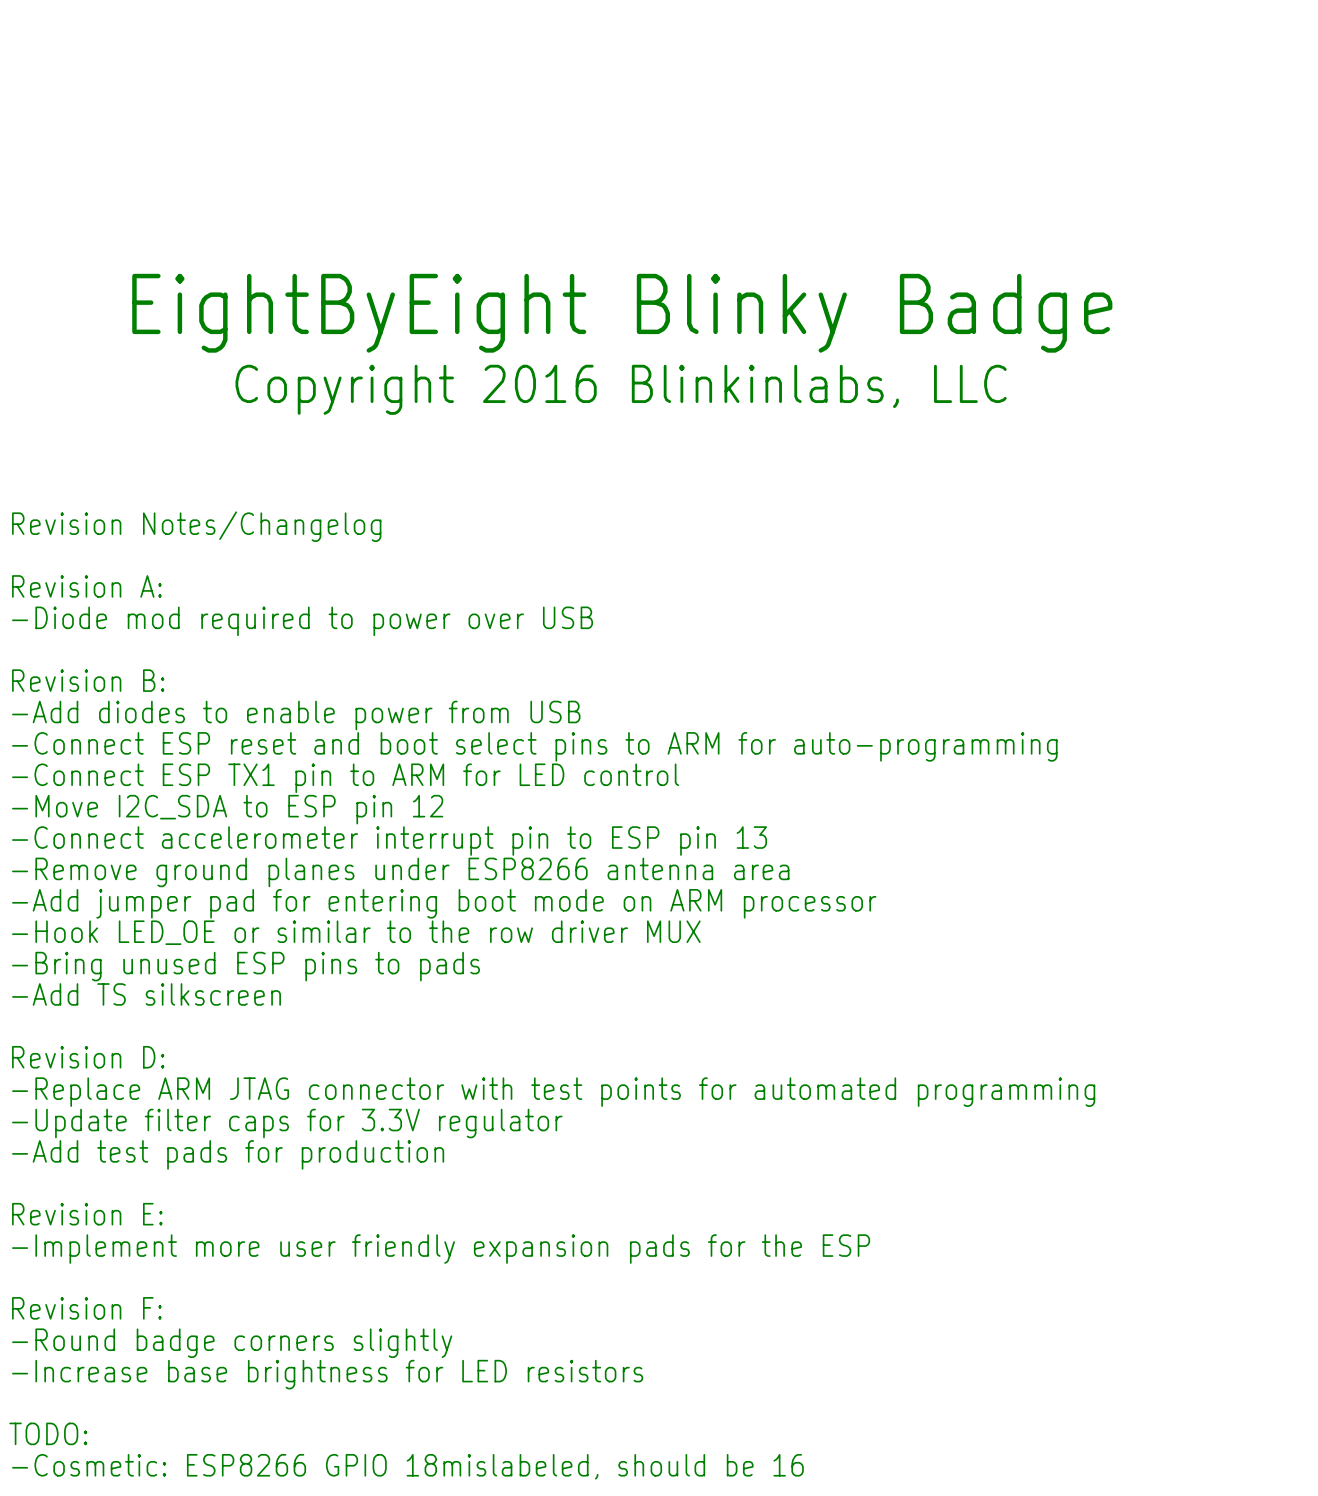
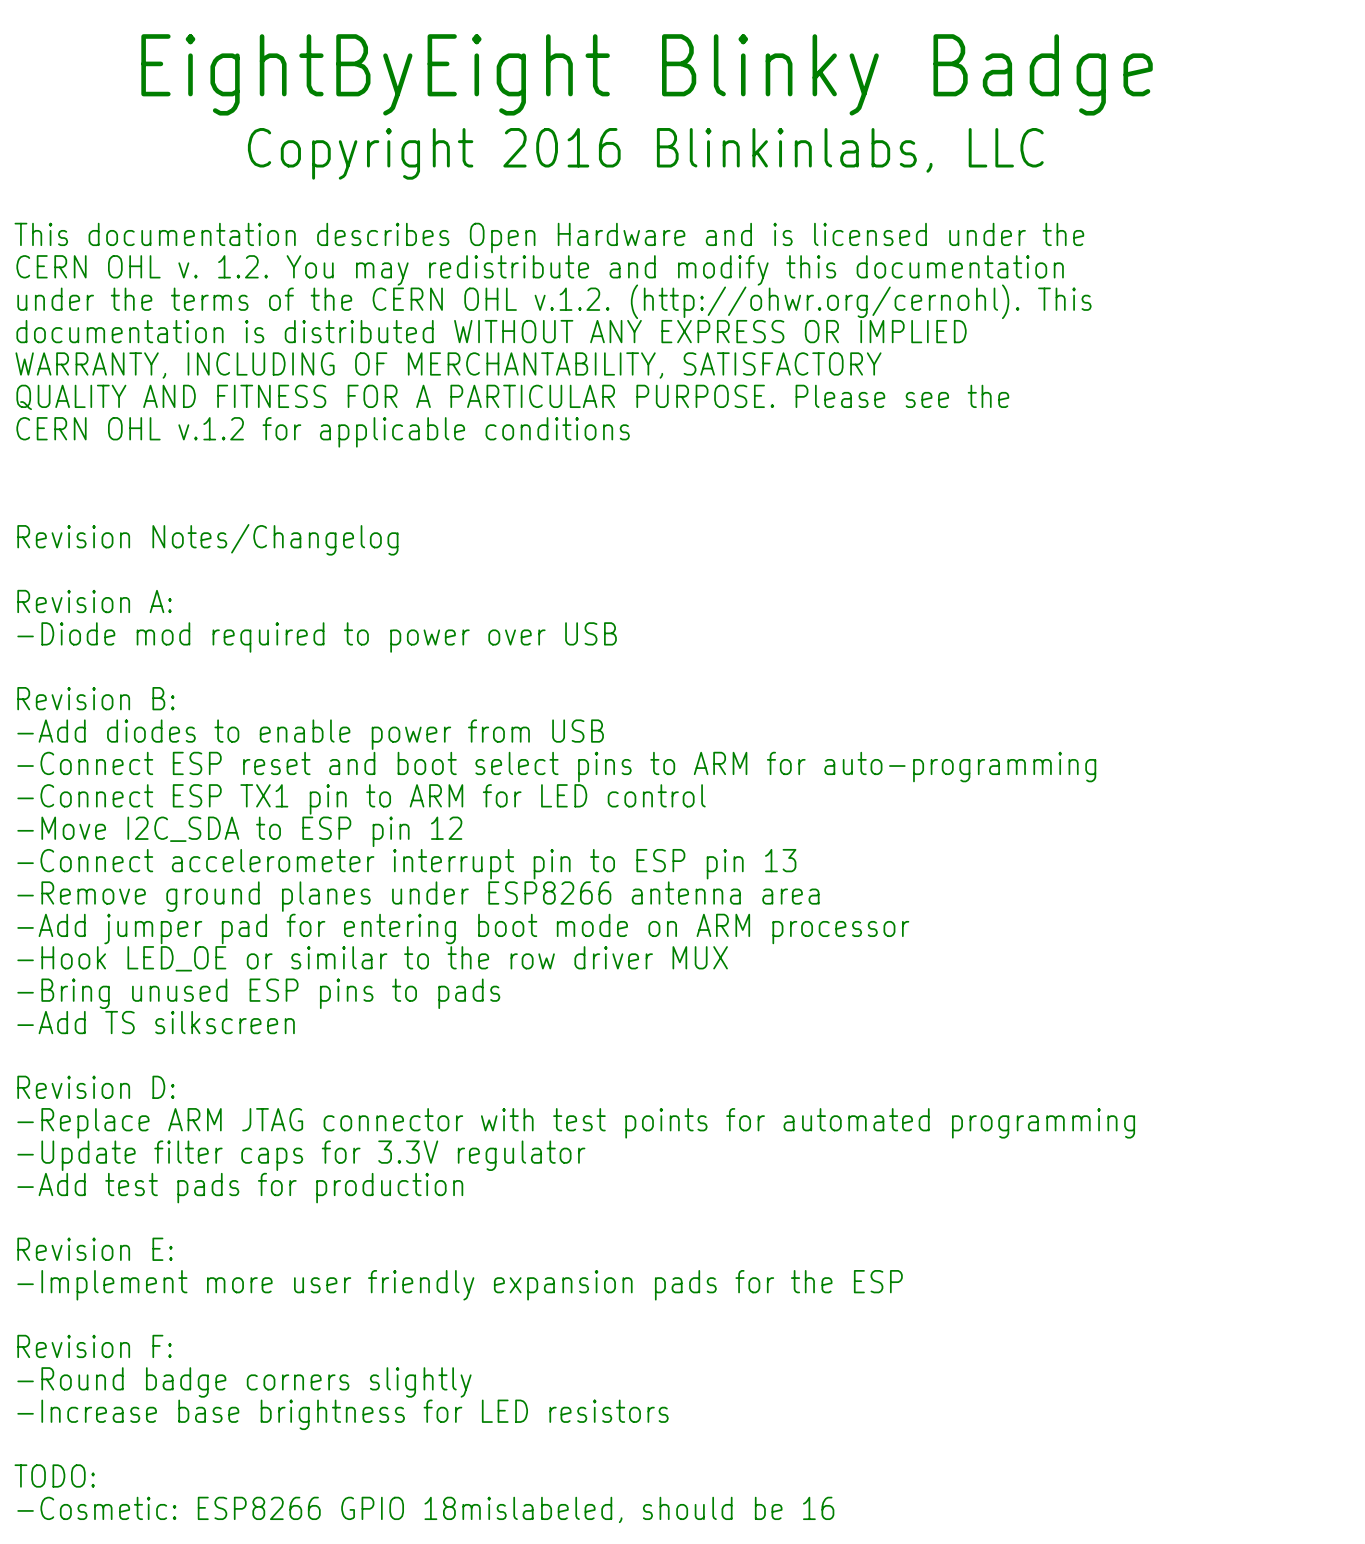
text: none -> EightByEight Blinky Badge (647, 74)
text: none -> Copyright 2016 Blinkinlabs, LLC (645, 153)
text: none -> This documentation describes Open Hardware and is licensed under the (549, 238)
text: none -> CERN OHL v. 1.2. You may redistribute and modify this documentation (540, 270)
text: none -> under the terms of the CERN OHL v.1.2. (http://ohwr.org/cernohl). This (554, 301)
text: EightByEight Blinky Badge (622, 313) -> none
text: none -> documentation is distributed WITHOUT ANY EXPRESS OR IMPLIED (491, 331)
text: none -> WARRANTY, INCLUDING OF MERCHANTABILITY, SATISFACTORY (448, 365)
text: none -> QUALITY AND FITNESS FOR A PARTICULAR PURPOSE. Please see the (512, 397)
text: Copyright 2016 Blinkinlabs, LLC (621, 389) -> none
text: none -> CERN OHL v.1.2 for applicable conditions (323, 432)

